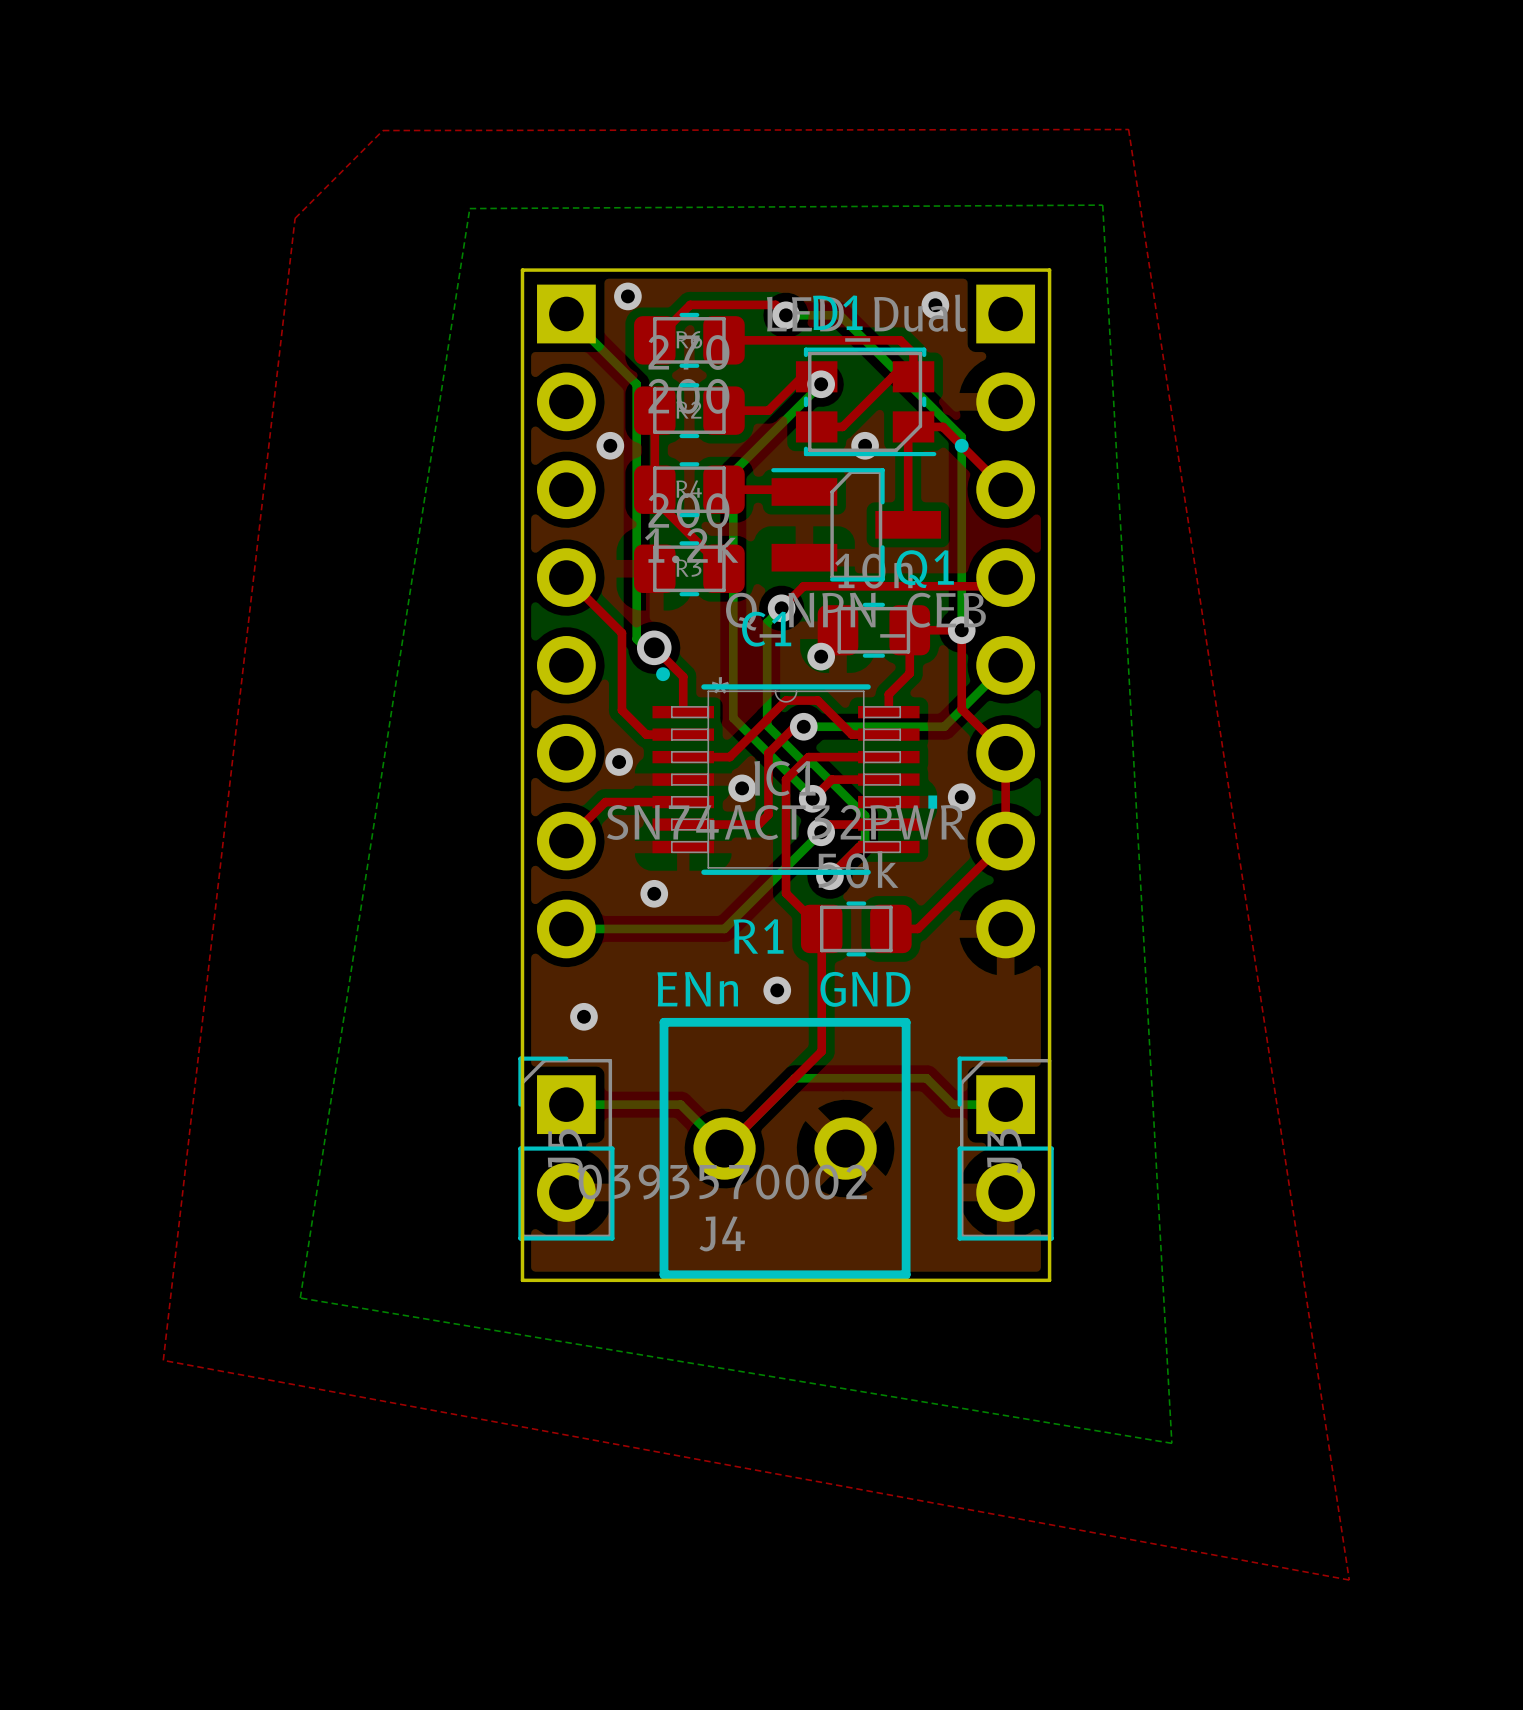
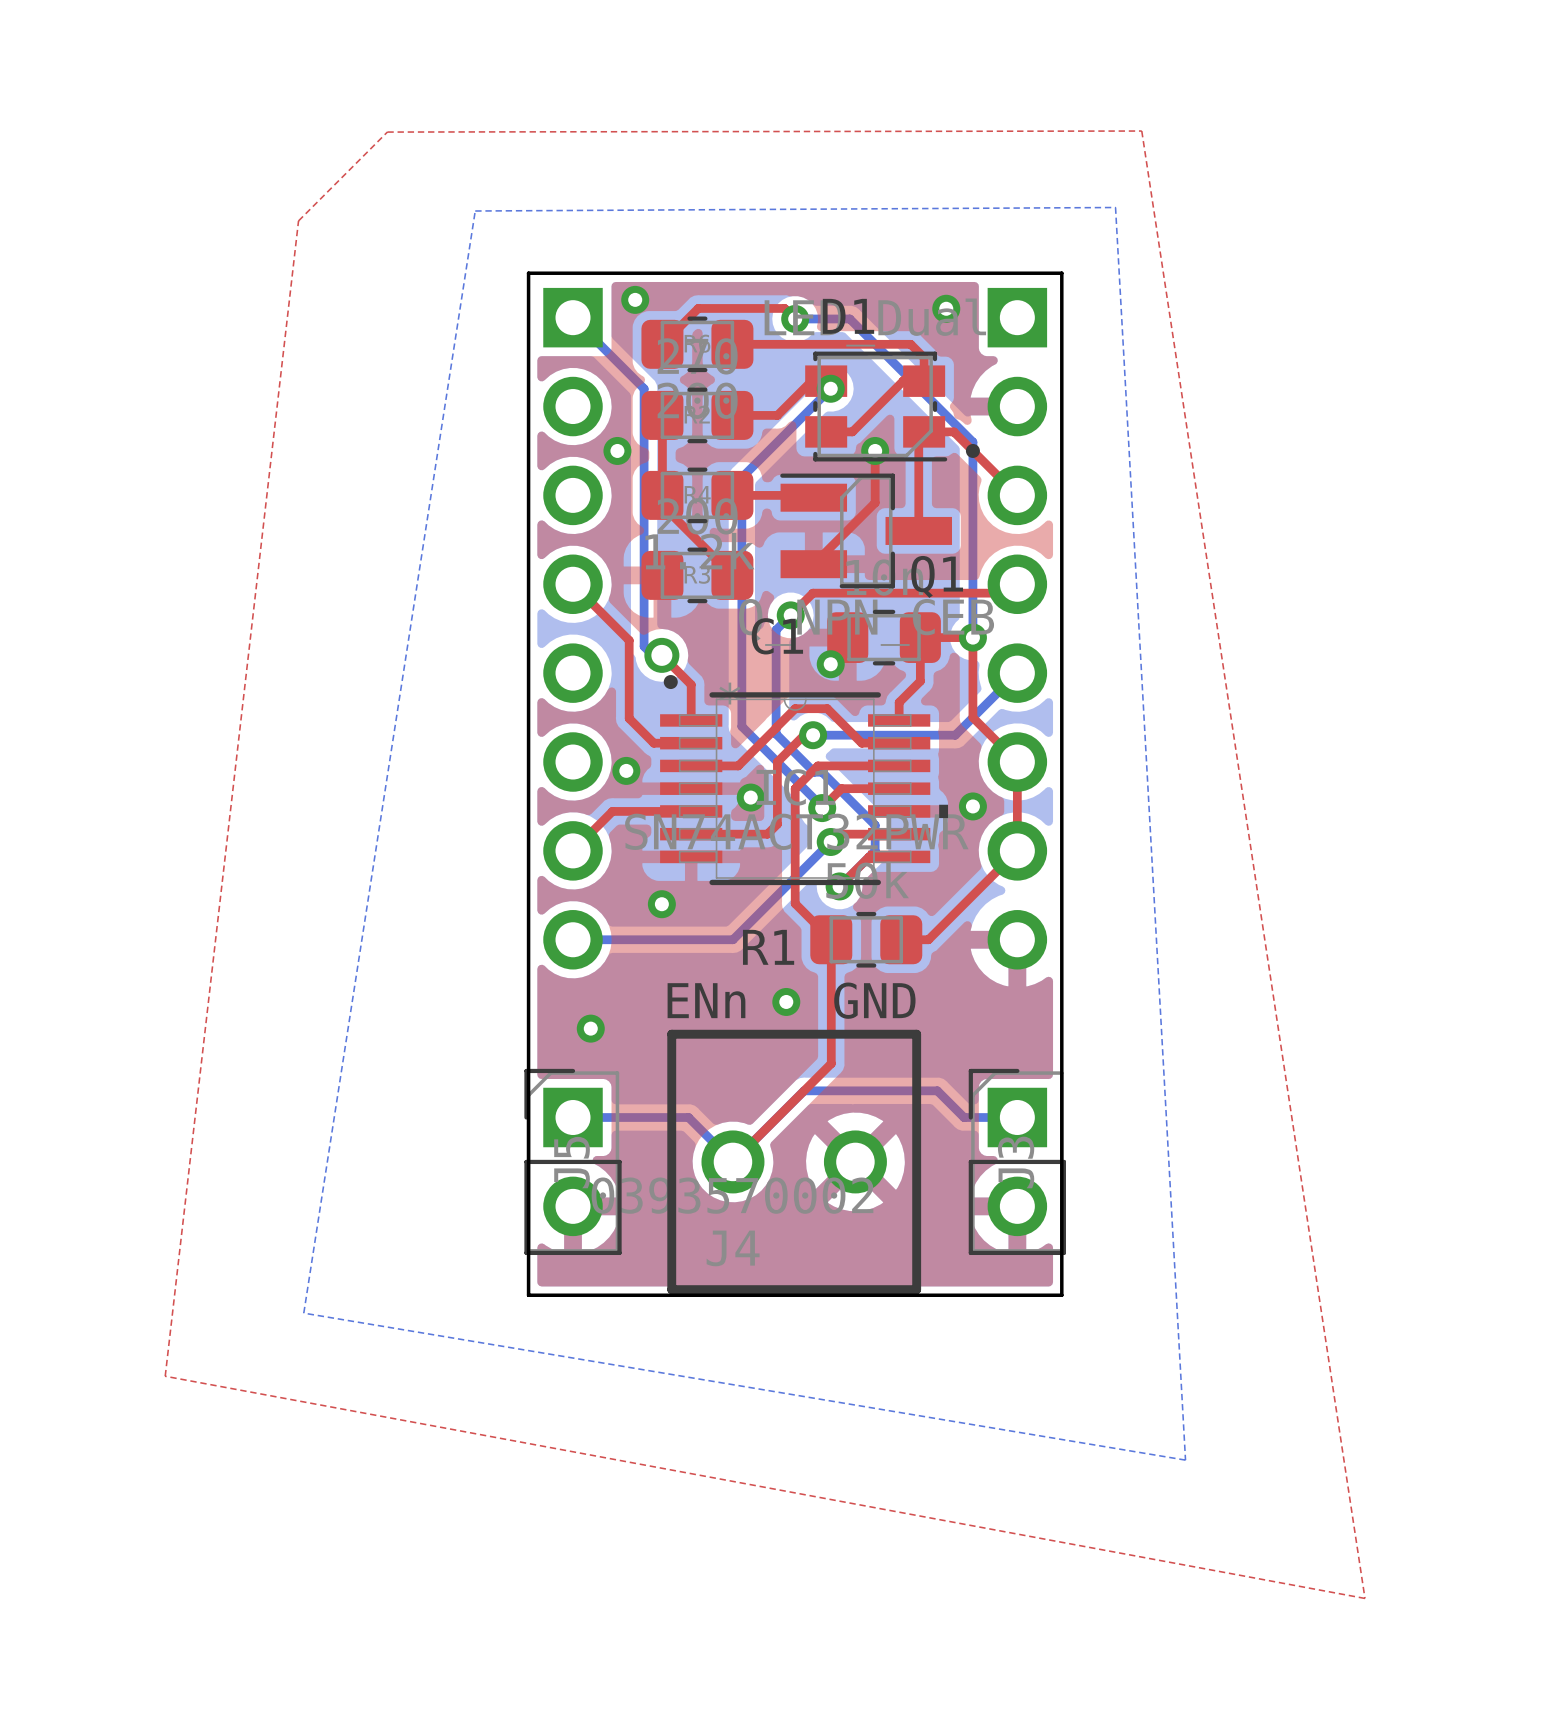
top track: none -> (875, 450) (875, 502) (813, 564)

